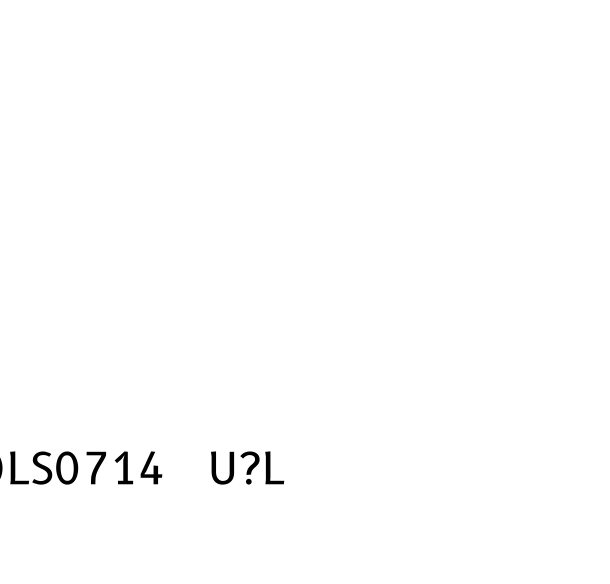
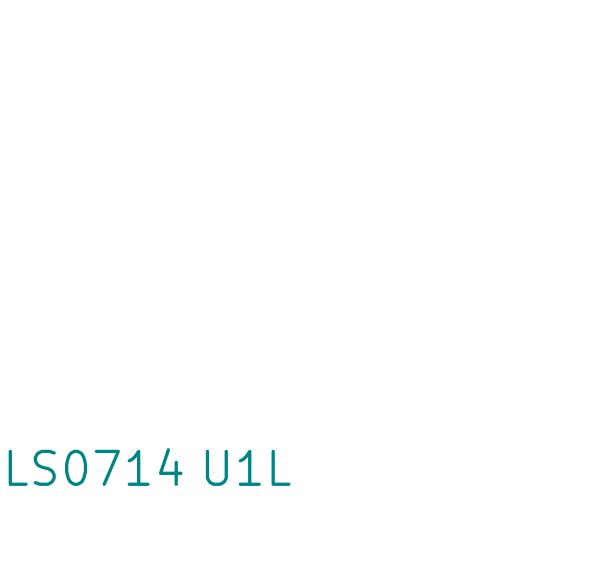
U?L name: U?L (247, 468) -> U1L (248, 467)

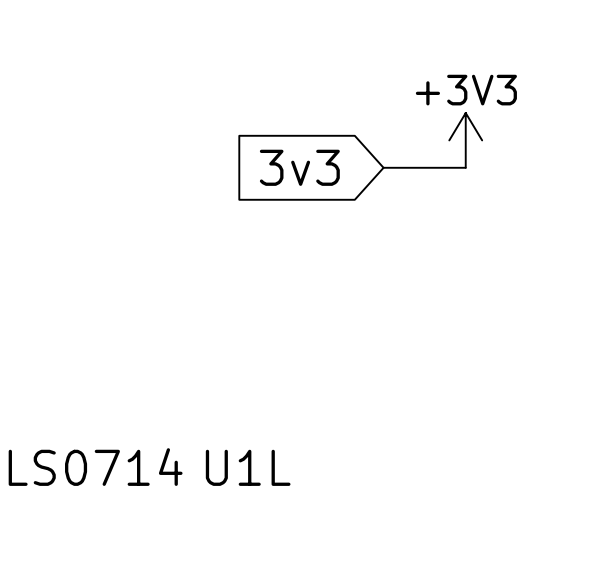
power symbol: none -> +3V3 (465, 140)
global label: none -> 3v3 (299, 167)
wire: none -> (383, 167) (465, 167)

